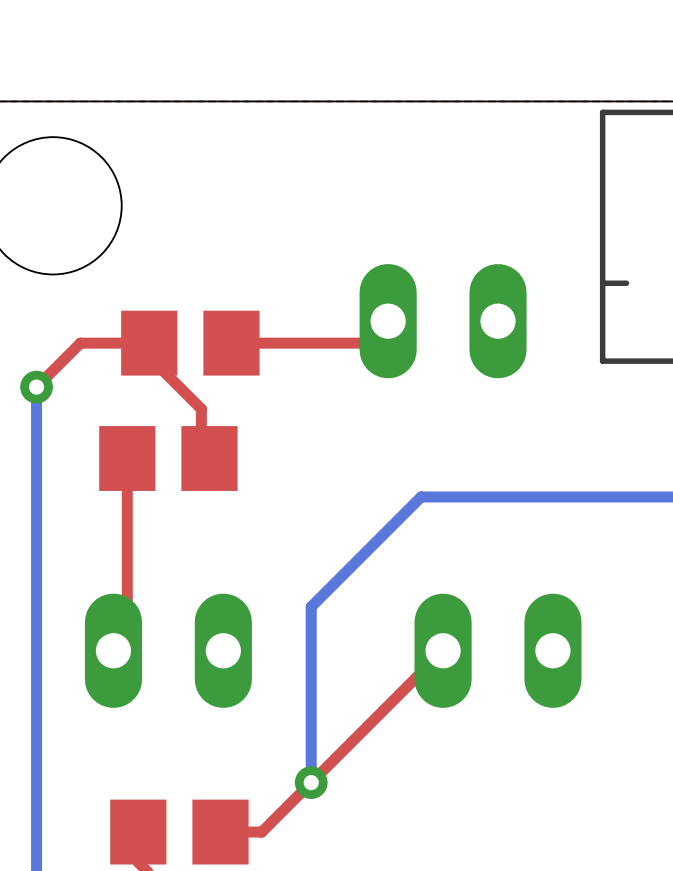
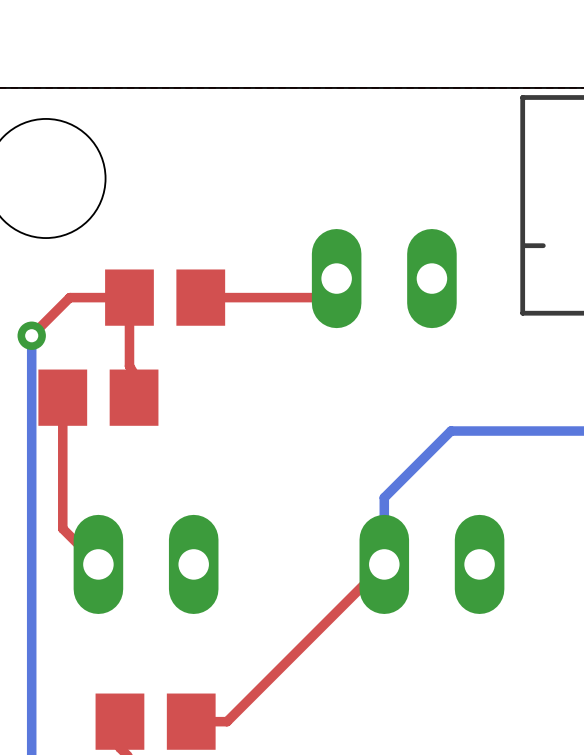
top track: (149, 356) (201, 409) (201, 450) (209, 458) -> (129, 309) (129, 366) (134, 373) (134, 397)
top track: (127, 458) (127, 636) (113, 650) -> (62, 397) (62, 528) (98, 564)
part position: (168, 458) -> (98, 397)
bottom track: (519, 496) (421, 496) (311, 606) (311, 782) -> (450, 431) (384, 497) (384, 564)
via: (311, 782) -> none

